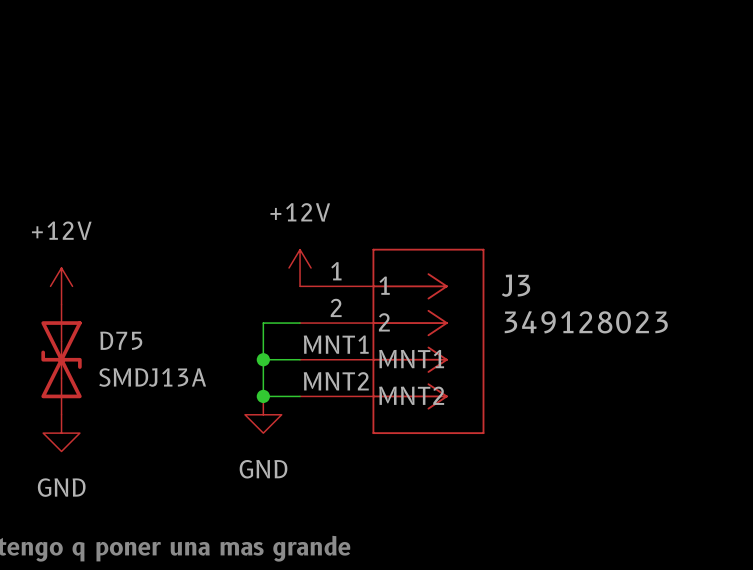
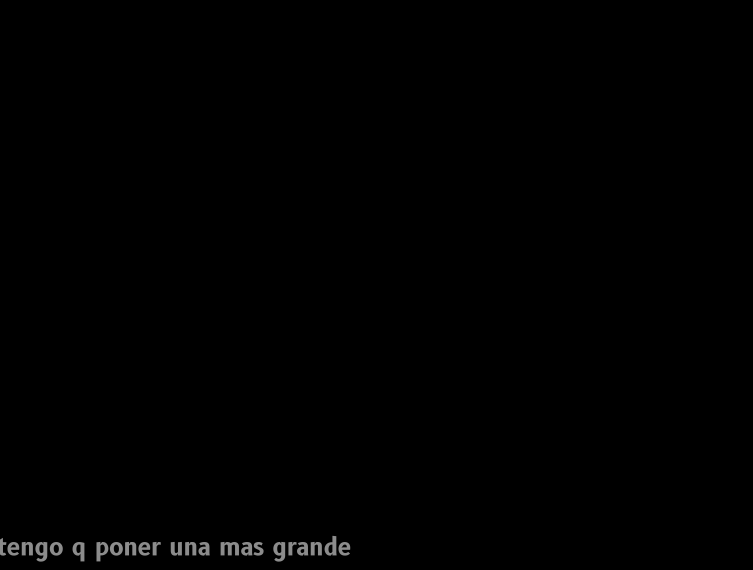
power symbol: +12V (300, 268) -> none
power symbol: +12V (61, 286) -> none
wire: (300, 323) (263, 323) (263, 396) (300, 396) -> none
J3: 349128023 (392, 341) -> none
D75: SMDJ13A (61, 359) -> none
wire: (263, 359) (300, 359) -> none
junction: (263, 359) -> none
junction: (263, 396) -> none
power symbol: GND (263, 414) -> none
power symbol: GND (61, 433) -> none

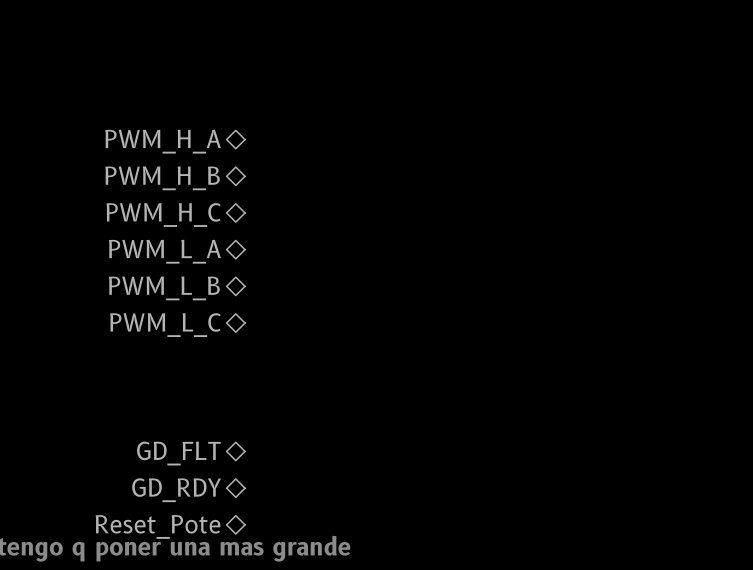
sheet pin: none -> PWM_H_A (163, 141)
sheet pin: none -> PWM_H_B (162, 178)
sheet pin: none -> PWM_H_C (163, 215)
sheet pin: none -> PWM_L_A (164, 251)
sheet pin: none -> PWM_L_B (164, 288)
sheet pin: none -> PWM_L_C (165, 325)
sheet pin: none -> GD_FLT (178, 453)
sheet pin: none -> GD_RDY (176, 490)
sheet pin: none -> Reset_Pote (157, 526)

